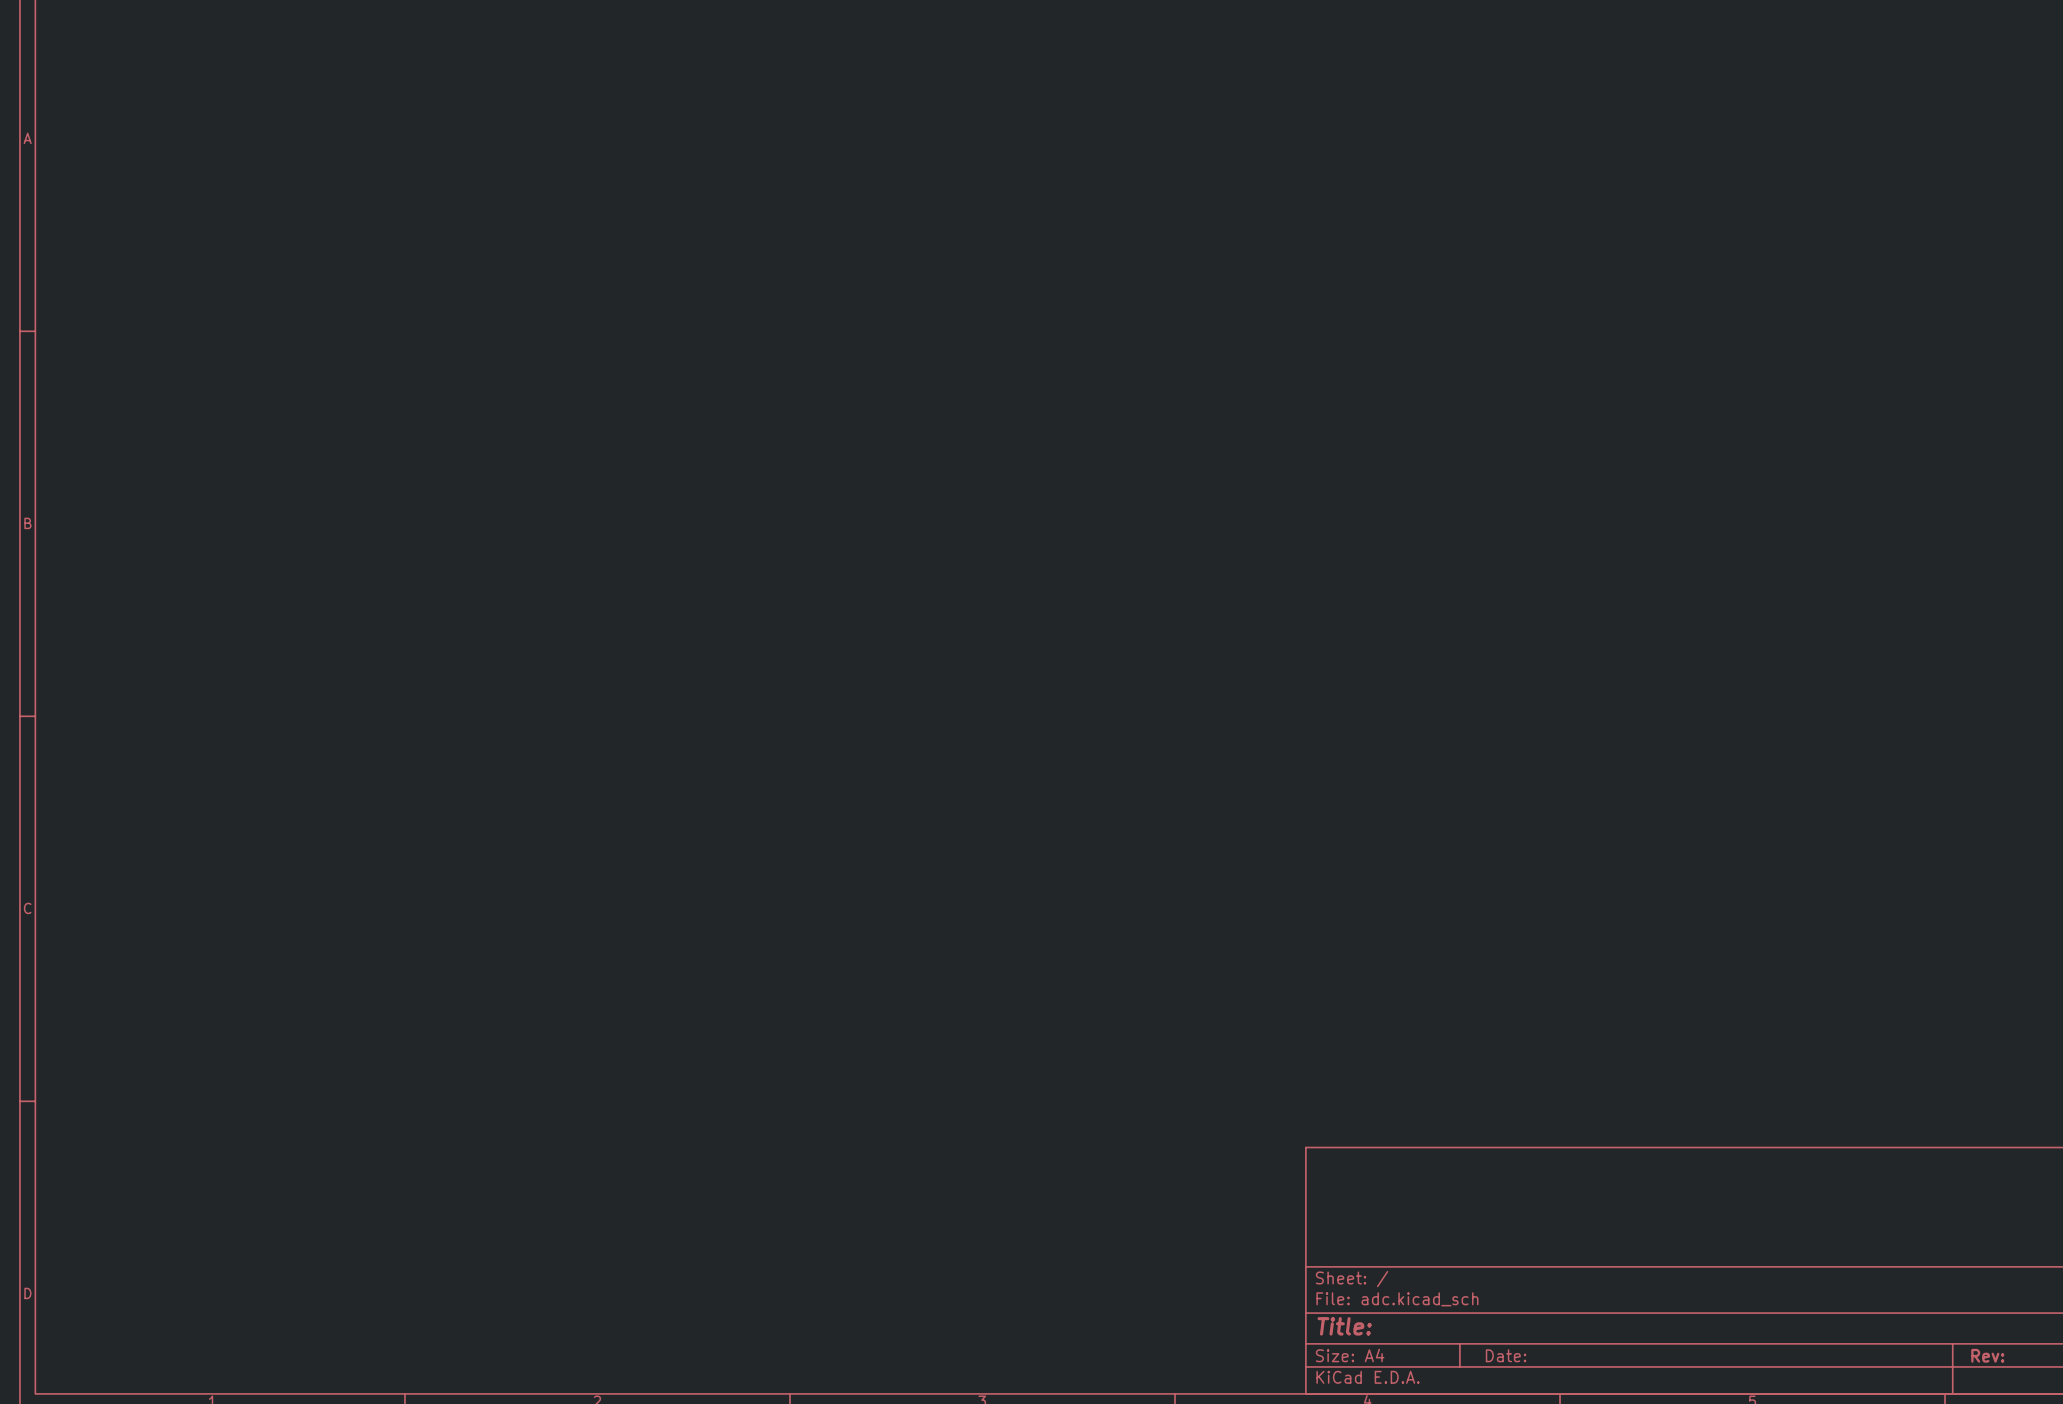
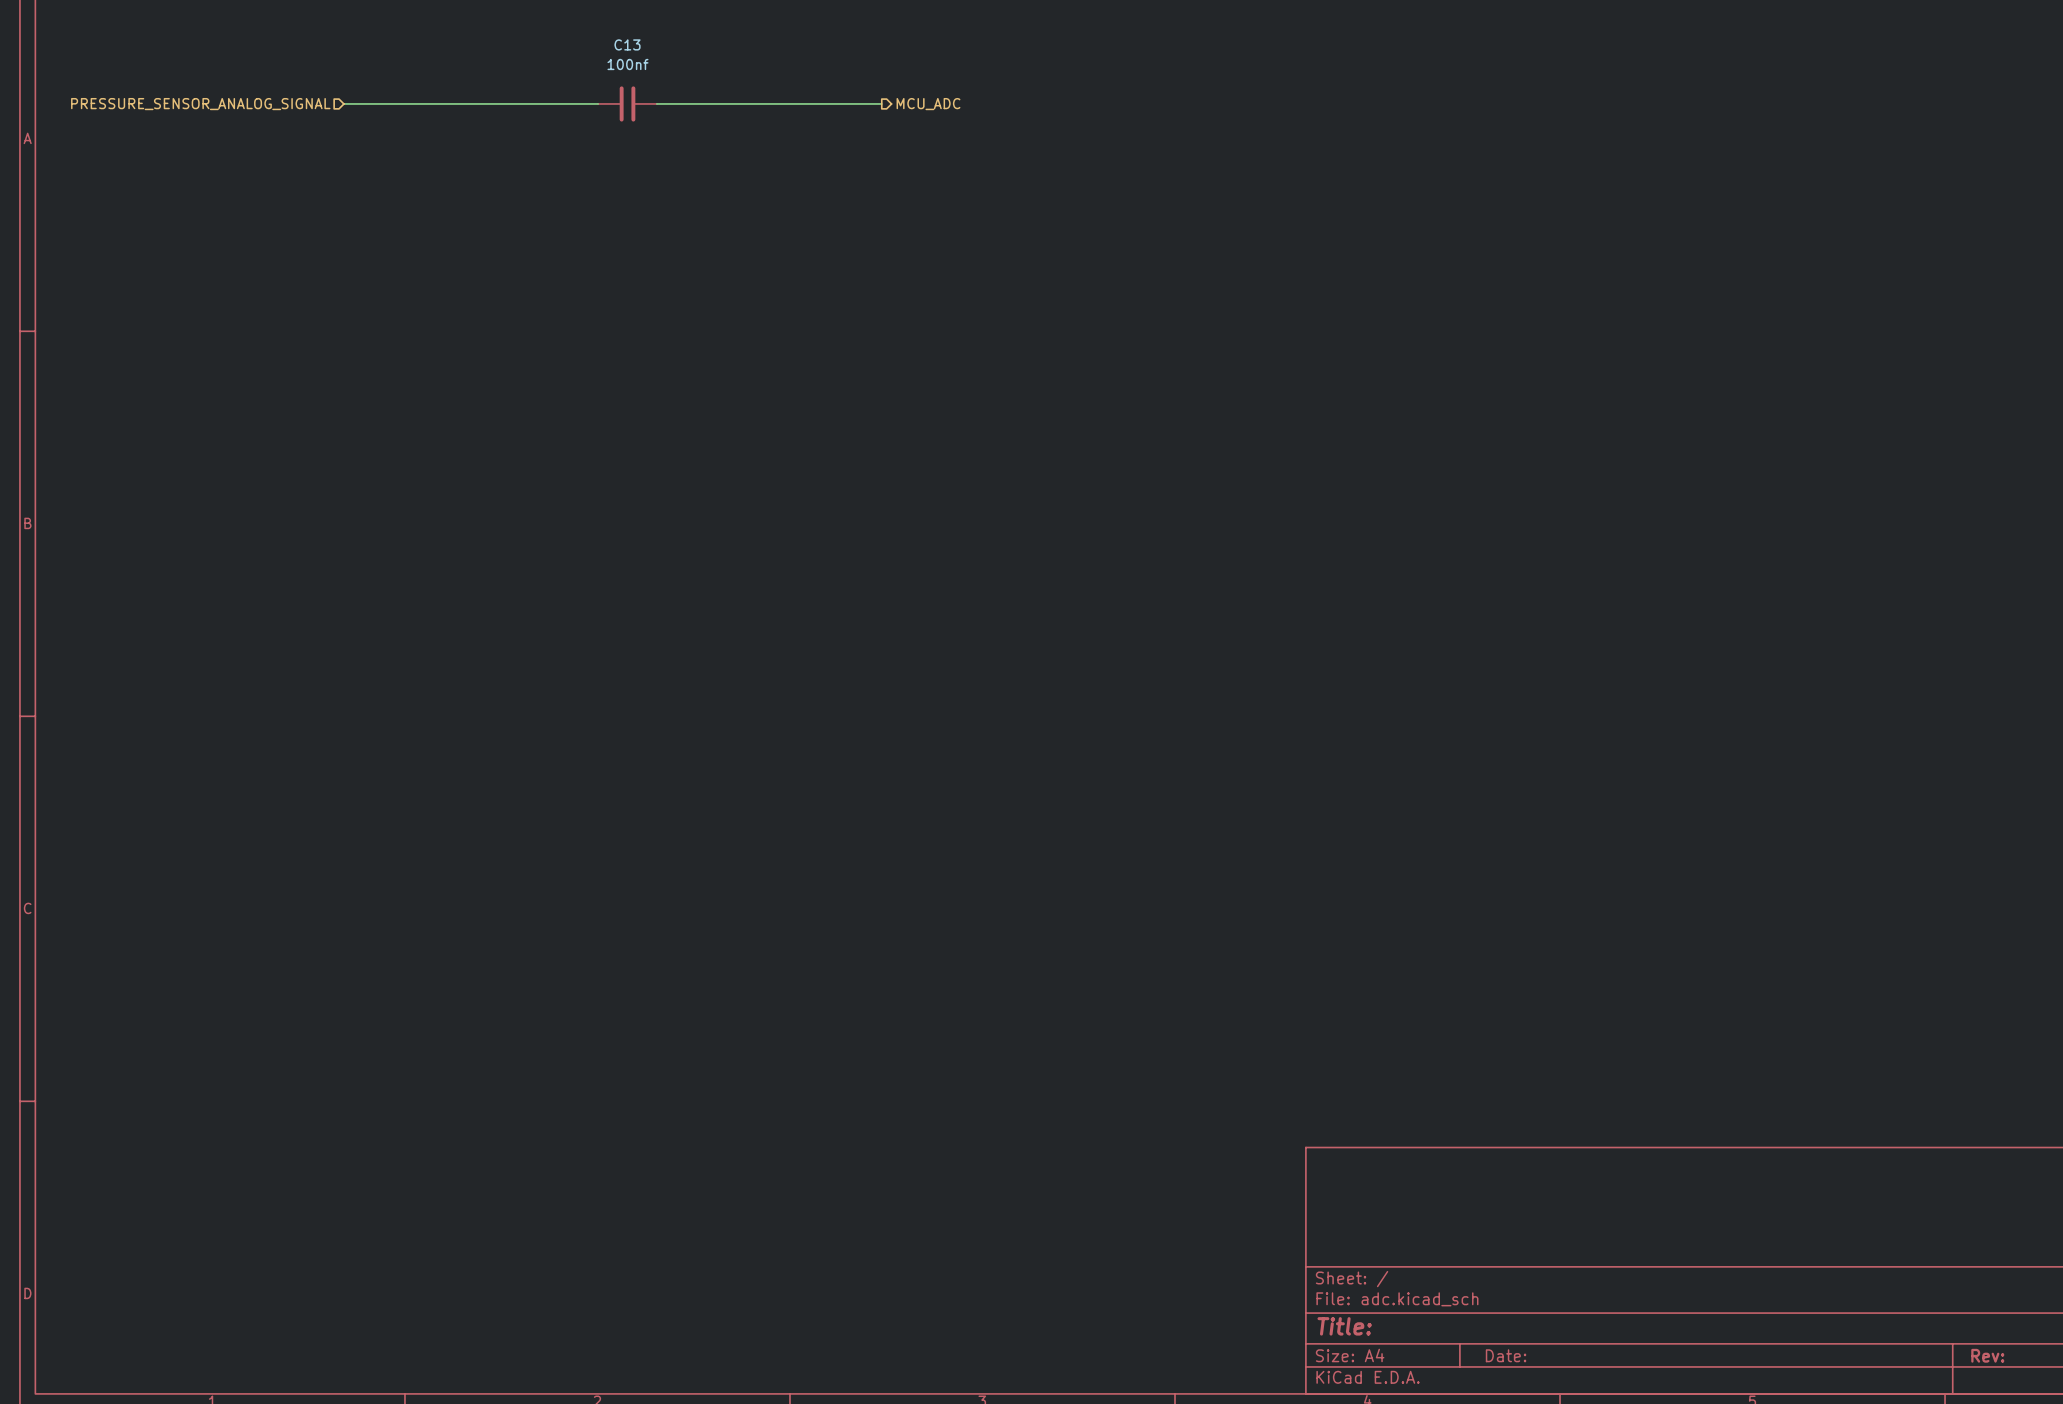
wire: none -> (343, 103) (598, 103)
C13: none -> 100nf (627, 103)
wire: none -> (656, 103) (881, 103)
hierarchical label: none -> PRESSURE_SENSOR_ANALOG_SIGNAL (200, 104)
hierarchical label: none -> MCU_ADC (928, 104)

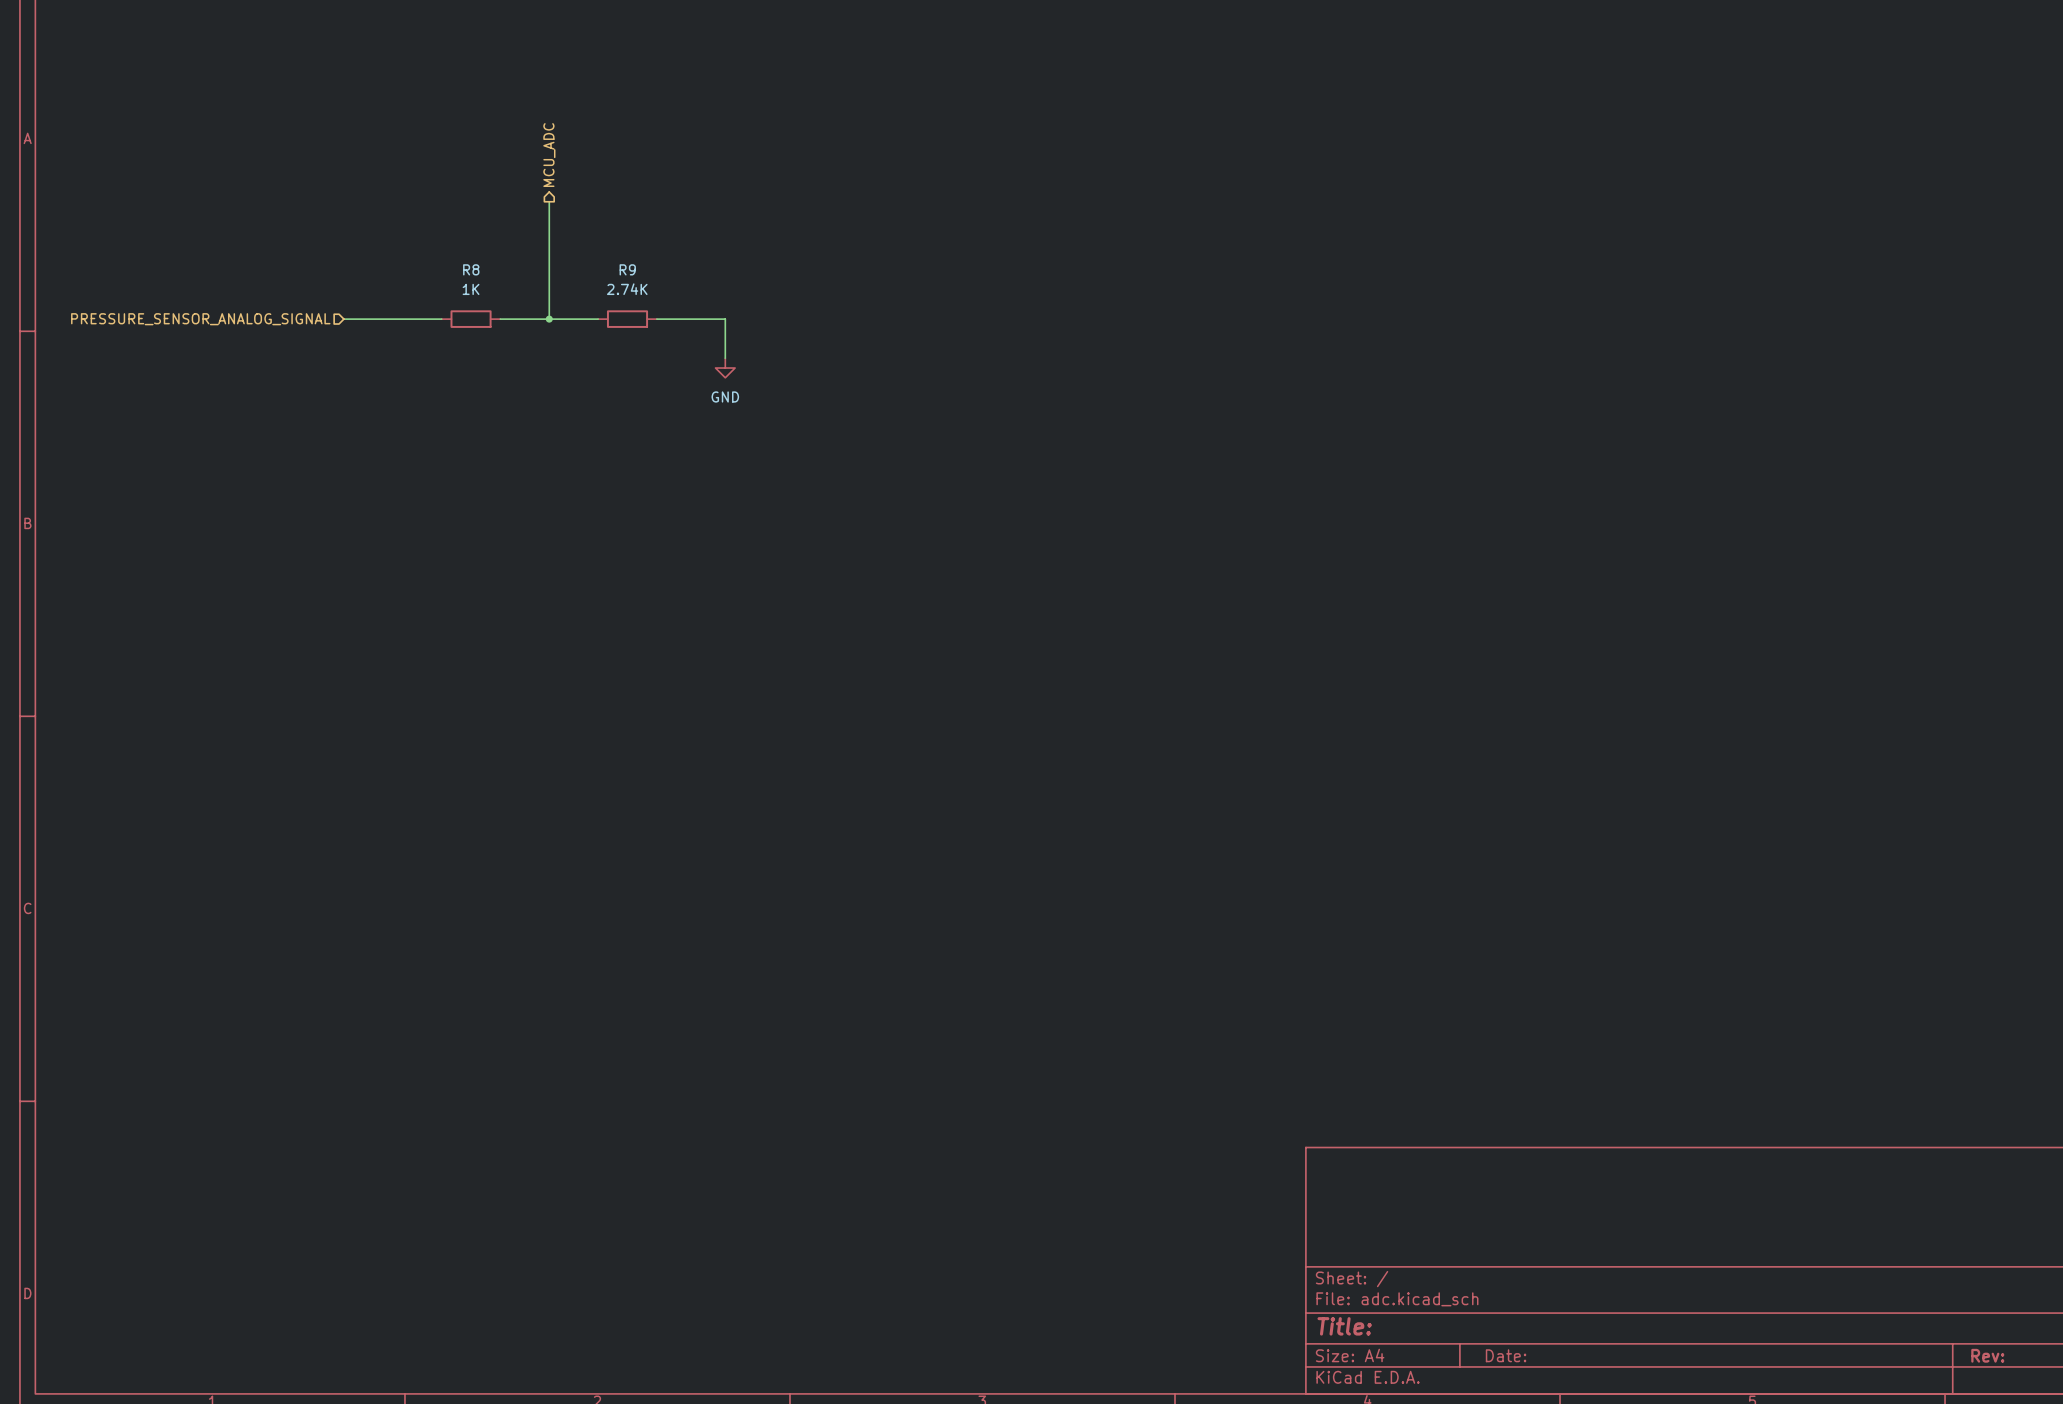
wire: (343, 103) (598, 103) -> none
C13: 100nf (627, 103) -> none
wire: (656, 103) (881, 103) -> none
hierarchical label: PRESSURE_SENSOR_ANALOG_SIGNAL (200, 104) -> none
hierarchical label: MCU_ADC (928, 104) -> none
hierarchical label: none -> MCU_ADC (549, 155)
wire: none -> (549, 201) (549, 319)
hierarchical label: none -> PRESSURE_SENSOR_ANALOG_SIGNAL (200, 319)
wire: none -> (343, 319) (441, 319)
R8: none -> 1K (471, 319)
wire: none -> (500, 319) (598, 319)
junction: none -> (549, 319)
R9: none -> 2.74K (627, 319)
wire: none -> (656, 319) (725, 319) (725, 358)
power symbol: none -> GND (725, 368)

